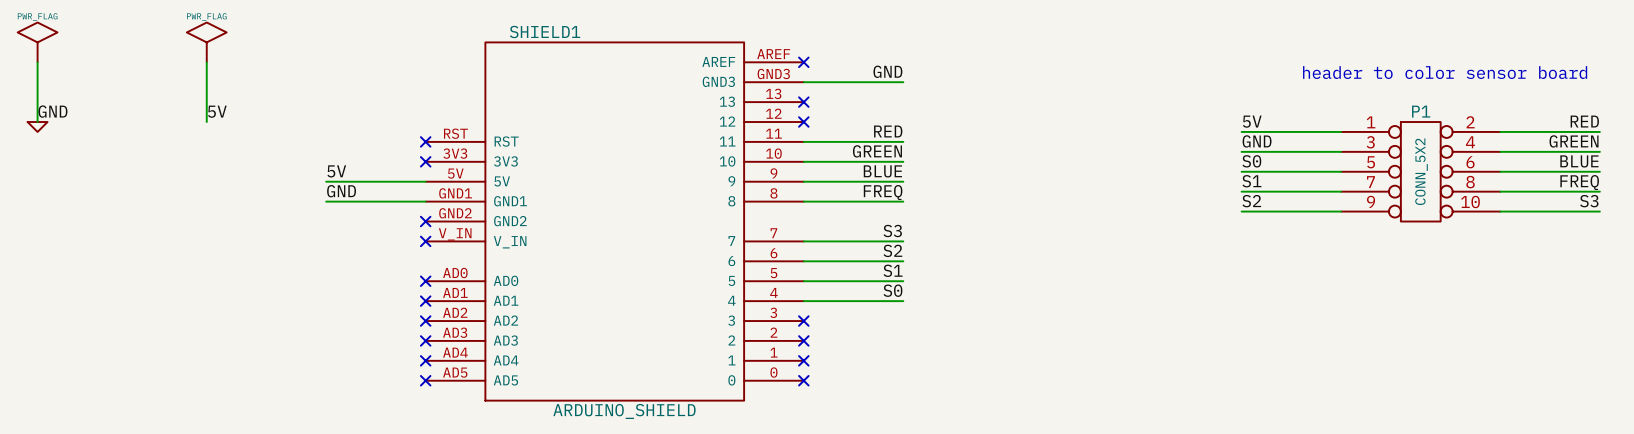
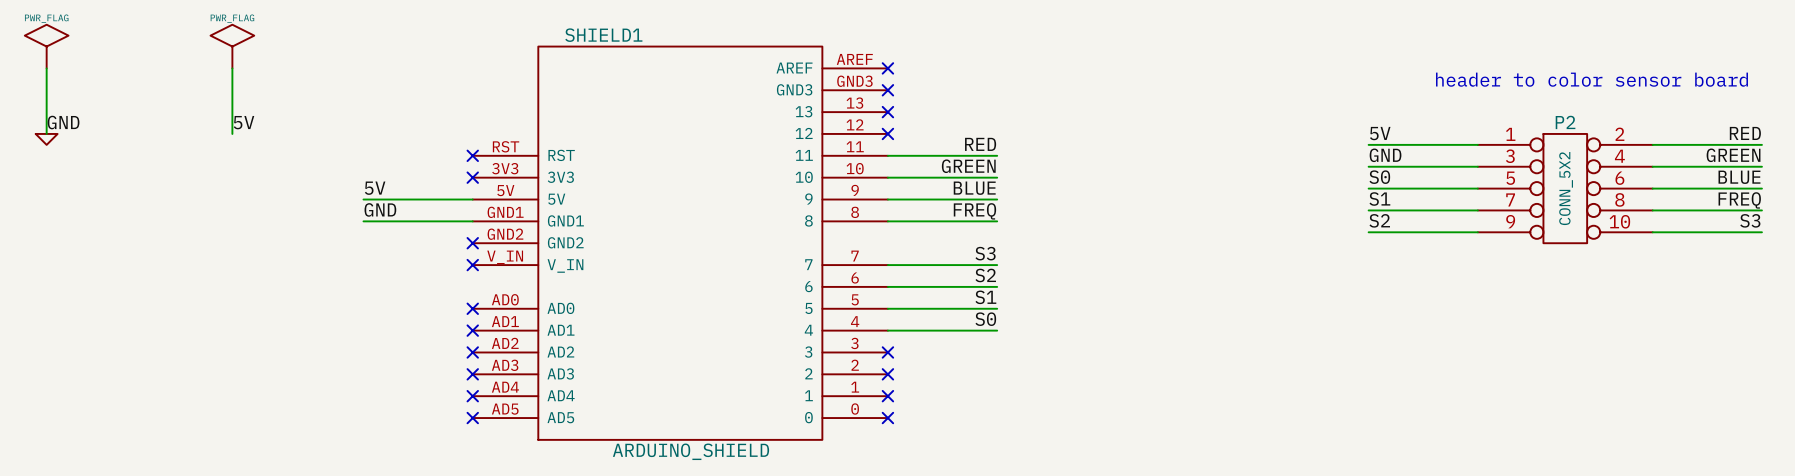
label: GND (887, 71) -> none
wire: (803, 82) (903, 82) -> none
no-connect mark: none -> (887, 90)
P1 name: P1 (1421, 111) -> P2 (1565, 122)

